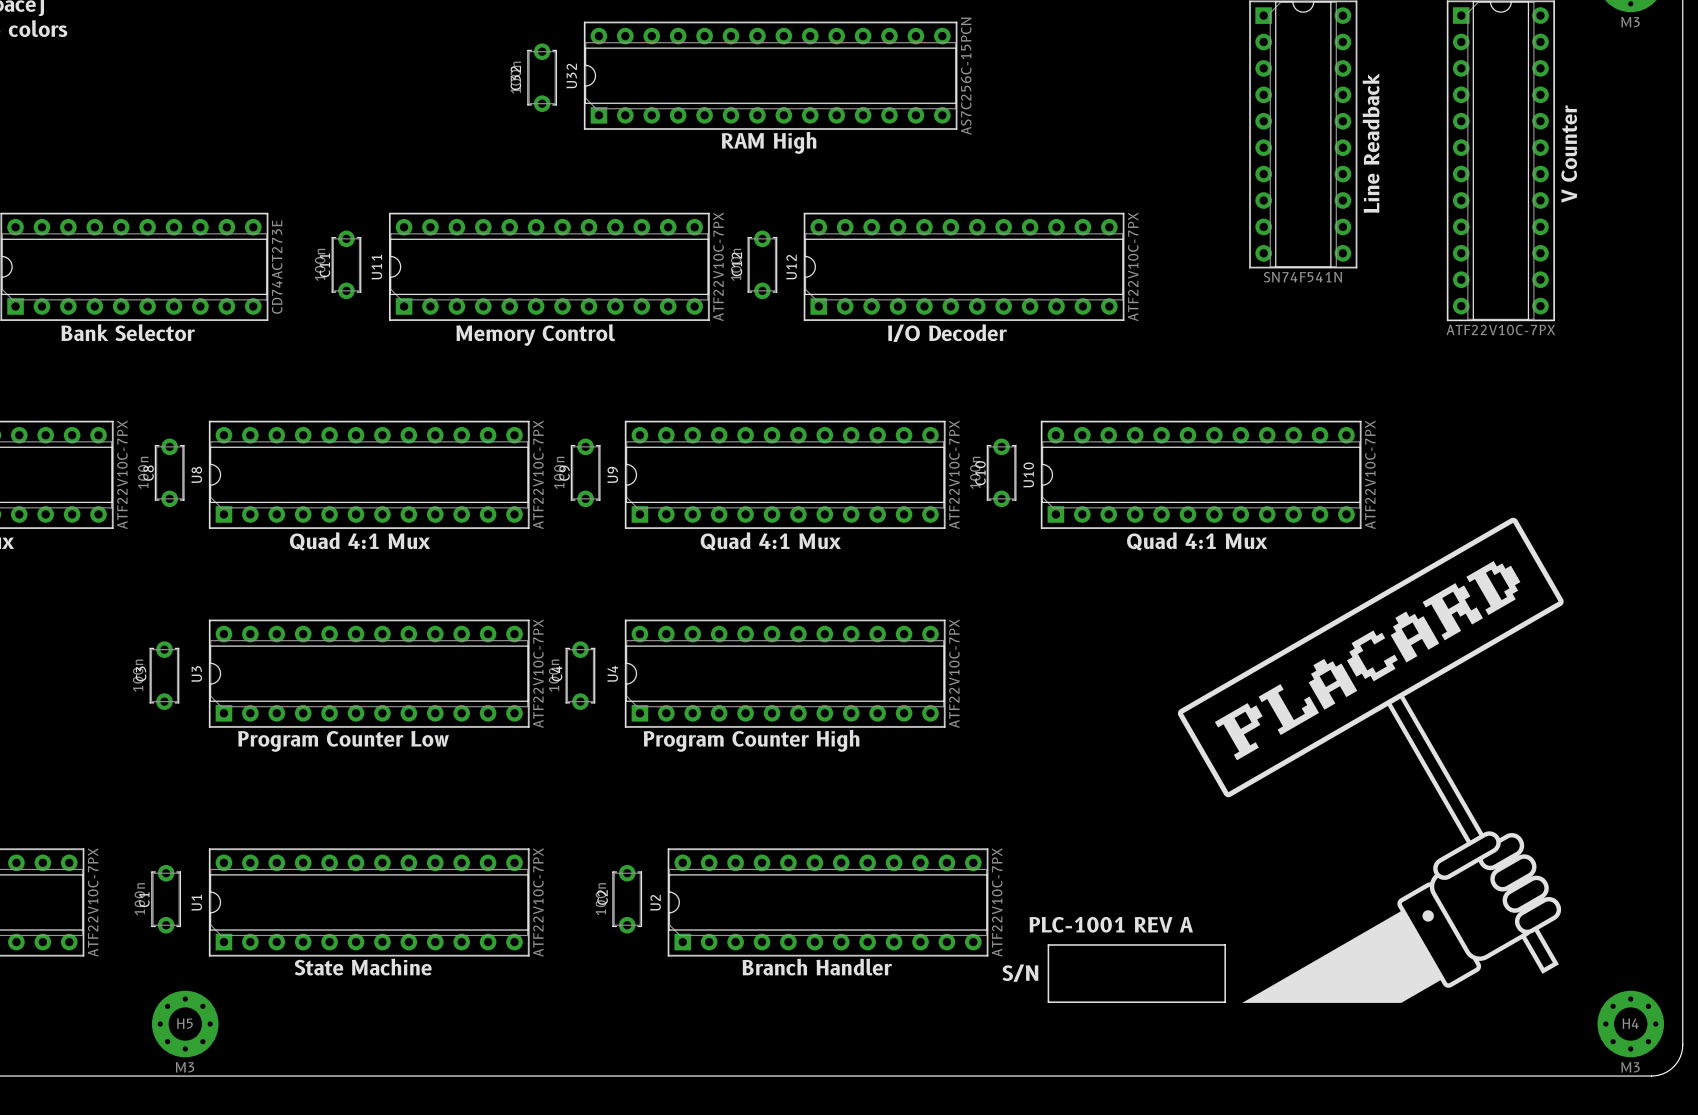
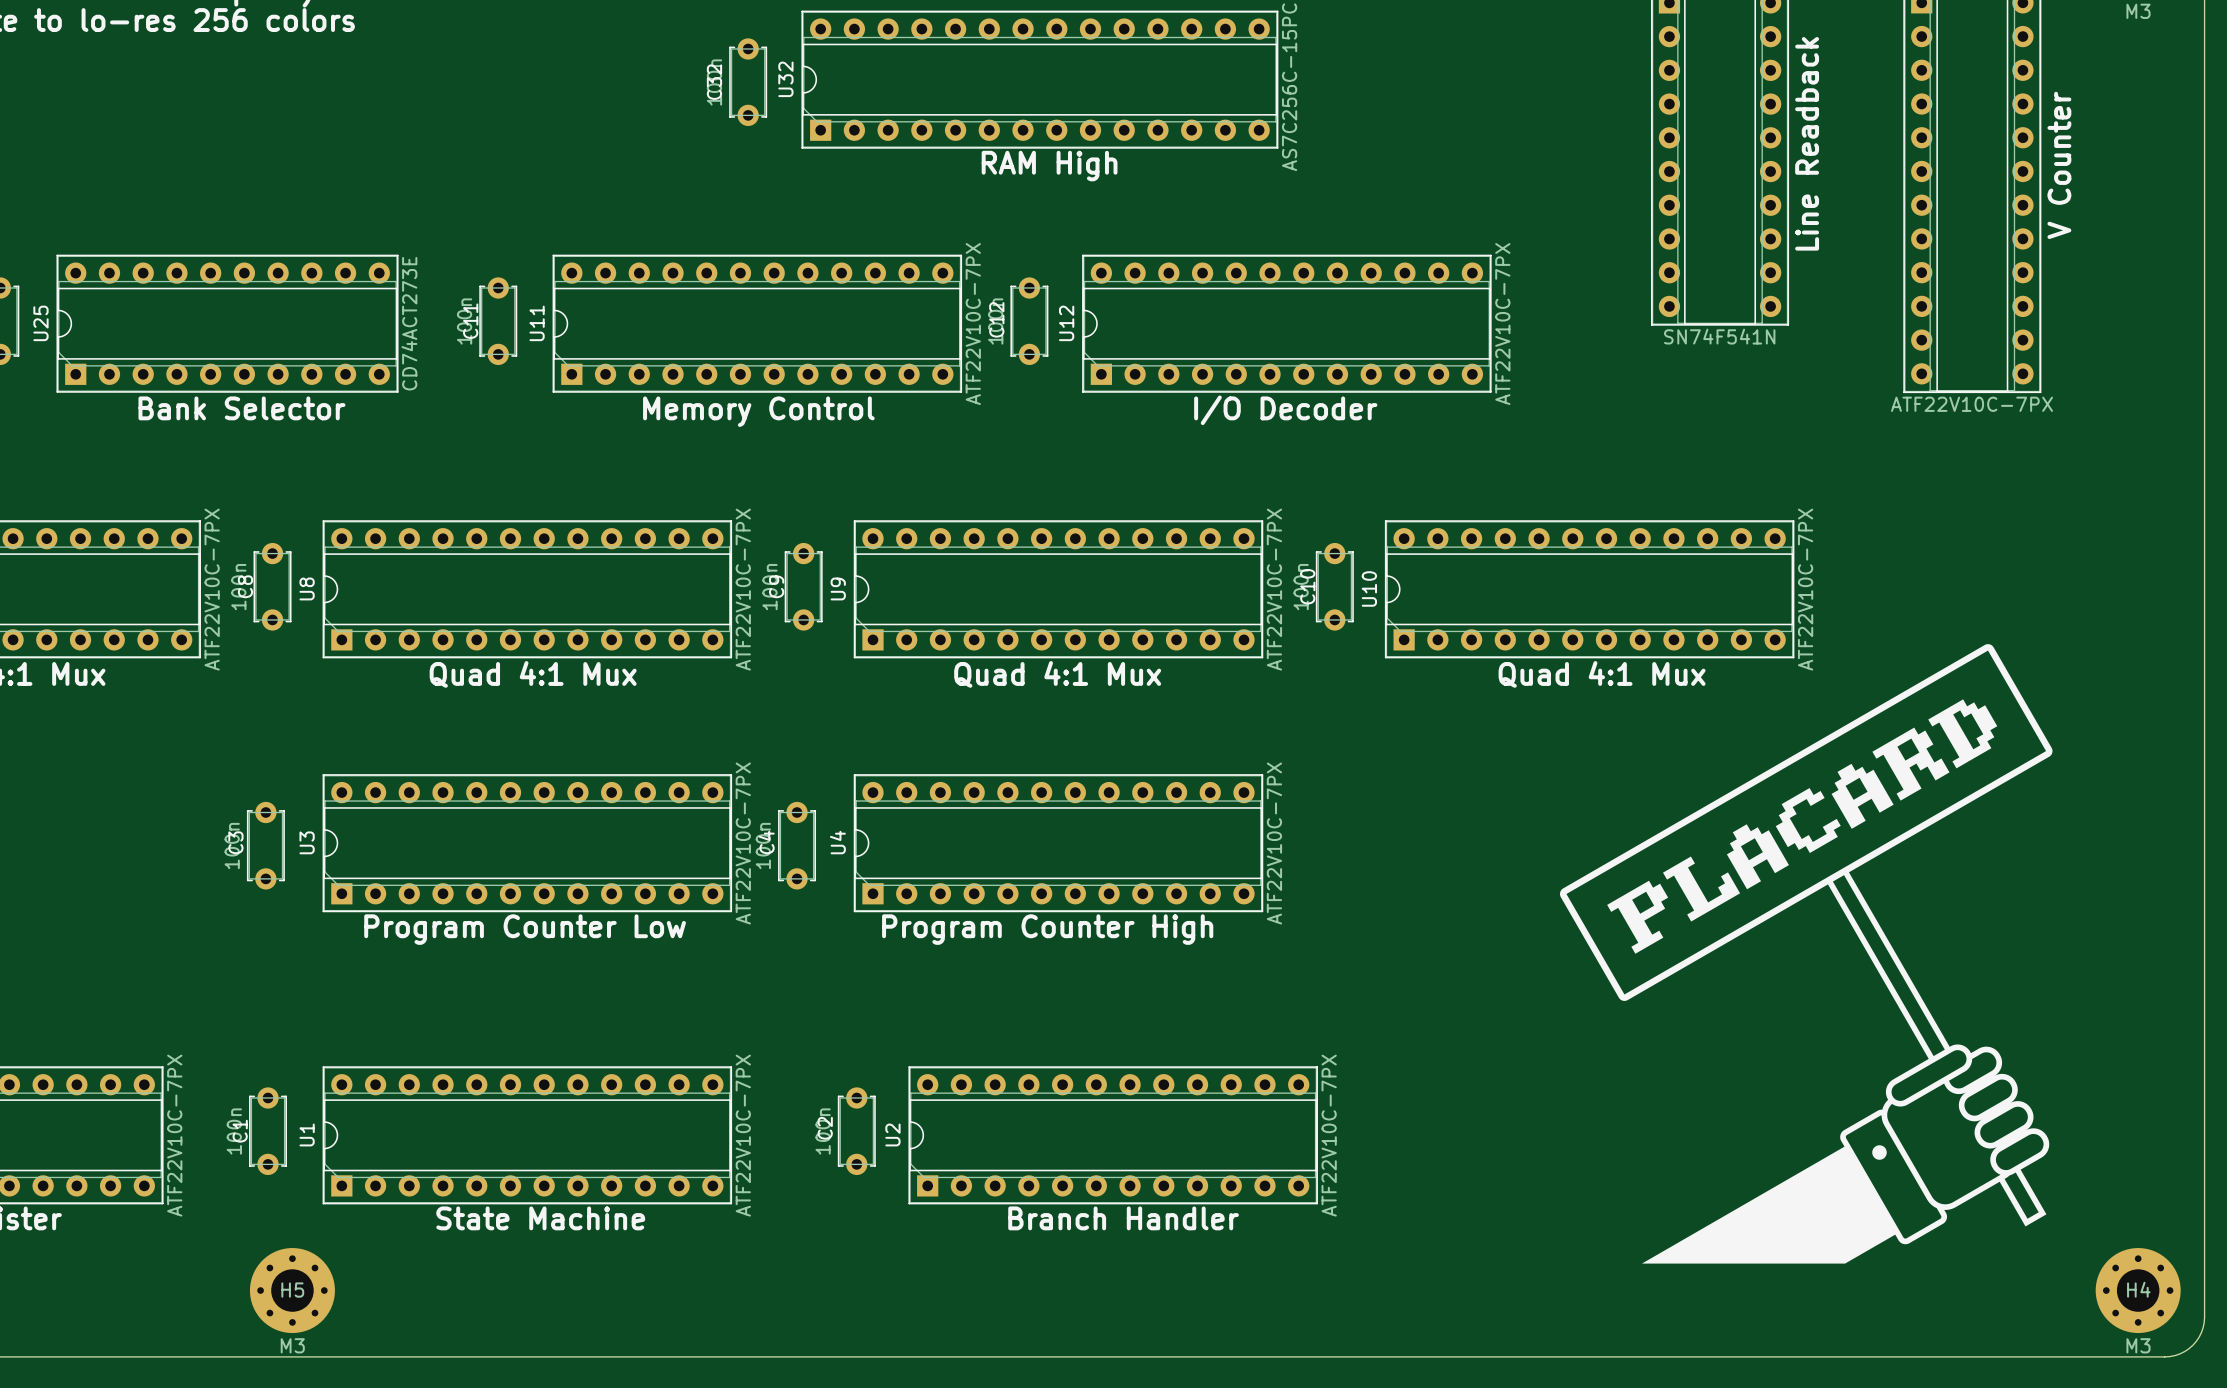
text: PLC-1001 REV A (1111, 924) -> none
line: (1048, 944) (1225, 944) (1225, 1002) (1048, 1002) (1048, 944) -> none
text: S/N (1020, 973) -> none

